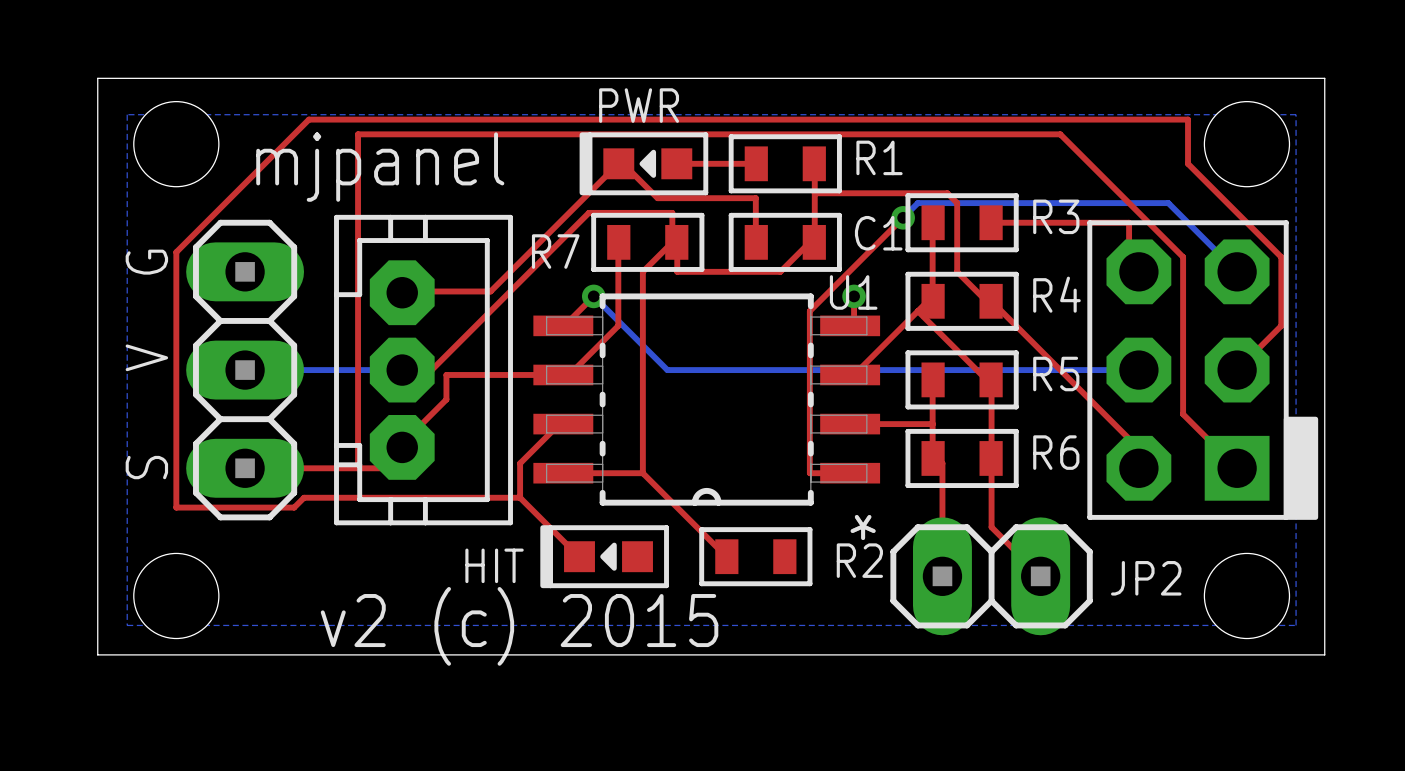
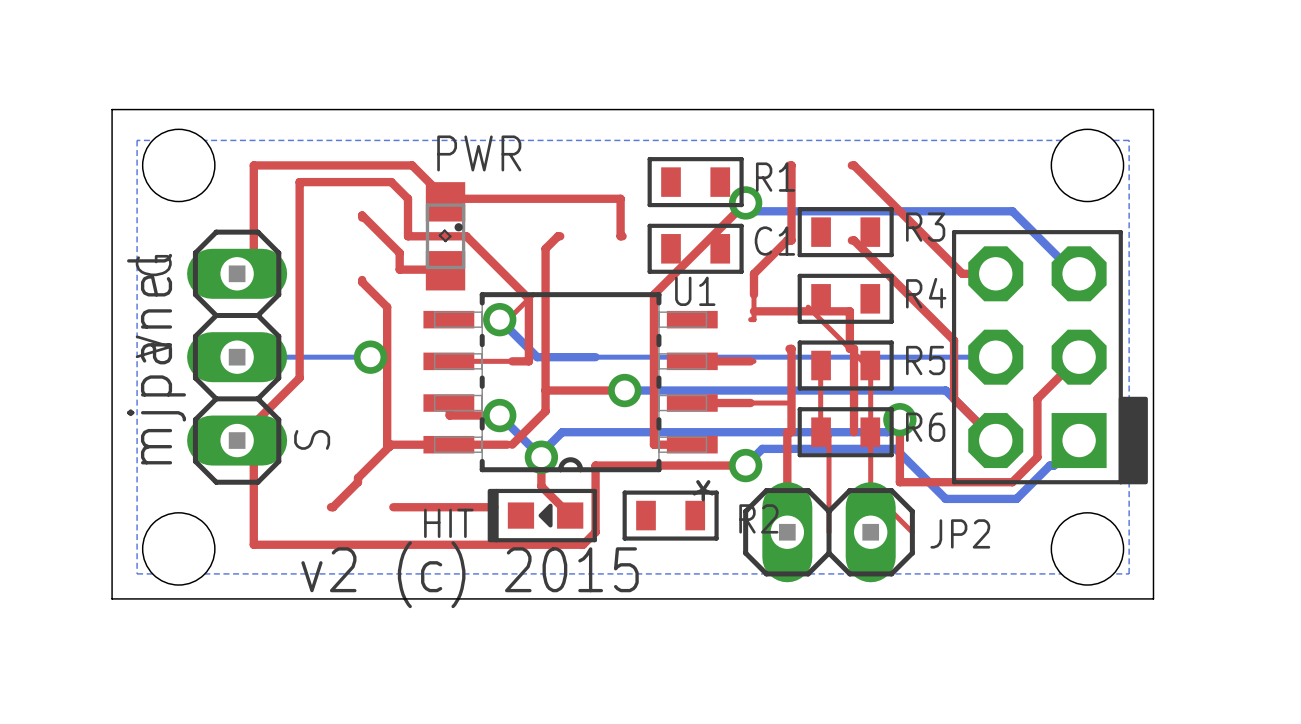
top track: none -> (789, 165) (791, 165) (791, 240) (787, 240) (753, 273) (753, 294)
PWR: (643, 163) -> none
top track: (676, 163) (756, 163) -> none
top track: (814, 163) (814, 242) (809, 242) (780, 271) (677, 271) (677, 242) (672, 242) -> none
text rotation: 0° (380, 167) -> 90° counterclockwise (156, 359)
top track: none -> (445, 198) (620, 198) (620, 236) (622, 236)
top track: none -> (445, 198) (412, 165) (253, 165) (253, 257) (237, 273)
top track: none -> (745, 202) (653, 294) (653, 444) (692, 444)
via: none -> (745, 202)
top track: (814, 193) (947, 193) (957, 203) (957, 271) (986, 301) (991, 301) (1138, 448) (1138, 468) -> (851, 240) (854, 240) (954, 340) (954, 398) (995, 440)
top track: none -> (362, 217) (362, 215) (399, 252) (399, 269) (445, 270)
top track: (903, 217) (809, 311) (809, 473) (850, 473) -> none
bottom track: (903, 217) (917, 203) (1168, 203) (1237, 271) -> (745, 202) (753, 211) (1012, 211) (1074, 273) (1079, 273)
via: (903, 217) -> none
top track: (932, 222) (932, 301) -> none
top track: (991, 222) (1129, 222) (1129, 262) (1138, 271) -> (851, 165) (854, 165) (962, 273) (995, 273)
PWR: none -> (445, 236)
top track: (618, 242) (618, 325) (569, 374) -> (745, 465) (595, 465) (595, 532) (583, 544) (253, 544) (253, 428) (237, 440) (299, 378) (299, 182) (391, 182) (408, 198) (408, 236) (466, 236) (528, 298) (528, 361) (512, 361)
R7: (647, 242) -> none
top track: (672, 242) (642, 271) (642, 473) -> none
top track: (672, 242) (672, 212) (588, 212) (431, 370) (421, 370) -> none
top track: (755, 242) (755, 198) (657, 198) (623, 163) (618, 163) (490, 291) (402, 292) -> none
top track: none -> (362, 279) (387, 307) (387, 444) (389, 446)
bottom track: (593, 296) (667, 370) -> (499, 319) (537, 357) (595, 357)
via: (593, 296) -> none
via: (854, 296) -> none
top track: (933, 301) (932, 296) (854, 374) -> none
top track: none -> (753, 311) (849, 311) (849, 348) (854, 348) (854, 432)
via: none -> (499, 319)
top track: none -> (789, 348) (791, 348) (791, 432) (787, 432) (787, 532)
via: none -> (370, 357)
part: (423, 370) -> none
top track: (1237, 370) (1281, 325) (1281, 257) (1188, 163) (1188, 119) (308, 119) (176, 252) (176, 507) (294, 507) (304, 497) (520, 497) -> (1079, 357) (1037, 398) (1037, 457) (1012, 482) (899, 482) (899, 419)
top track: (494, 374) (446, 374) (446, 399) (402, 443) (402, 468) (245, 468) -> none
top track: none -> (692, 361) (750, 361)
U1 position: (706, 399) -> (570, 382)
top track: none -> (545, 390) (624, 390)
bottom track: none -> (624, 390) (945, 390) (995, 440)
via: none -> (624, 390)
top track: none -> (448, 403) (449, 415) (499, 415)
top track: (563, 424) (559, 424) (520, 463) (520, 497) -> none
top track: none -> (692, 403) (750, 403)
top track: (898, 424) (932, 424) -> none
bottom track: none -> (499, 415) (541, 457) (541, 453) (562, 432) (887, 432) (899, 419)
via: none -> (499, 415)
via: none -> (899, 419)
text position: S (146, 467) -> S (312, 439)
top track: (358, 468) (358, 134) (1060, 134) (1183, 257) (1183, 414) (1237, 468) -> none
bottom track: none -> (1079, 440) (1054, 465) (1049, 465) (1016, 498) (945, 498) (895, 448) (762, 448) (745, 465)
top track: none -> (507, 444) (391, 444) (357, 478) (357, 482) (330, 507)
top track: (569, 473) (642, 473) -> (512, 444) (545, 411) (545, 248) (560, 236)
top track: (642, 473) (726, 556) -> none
top track: none -> (541, 457) (541, 486) (563, 507)
via: none -> (541, 457)
top track: (520, 497) (579, 556) -> none
via: none -> (745, 465)
top track: none -> (393, 507) (494, 507)
JP2 position: (991, 576) -> (829, 532)

